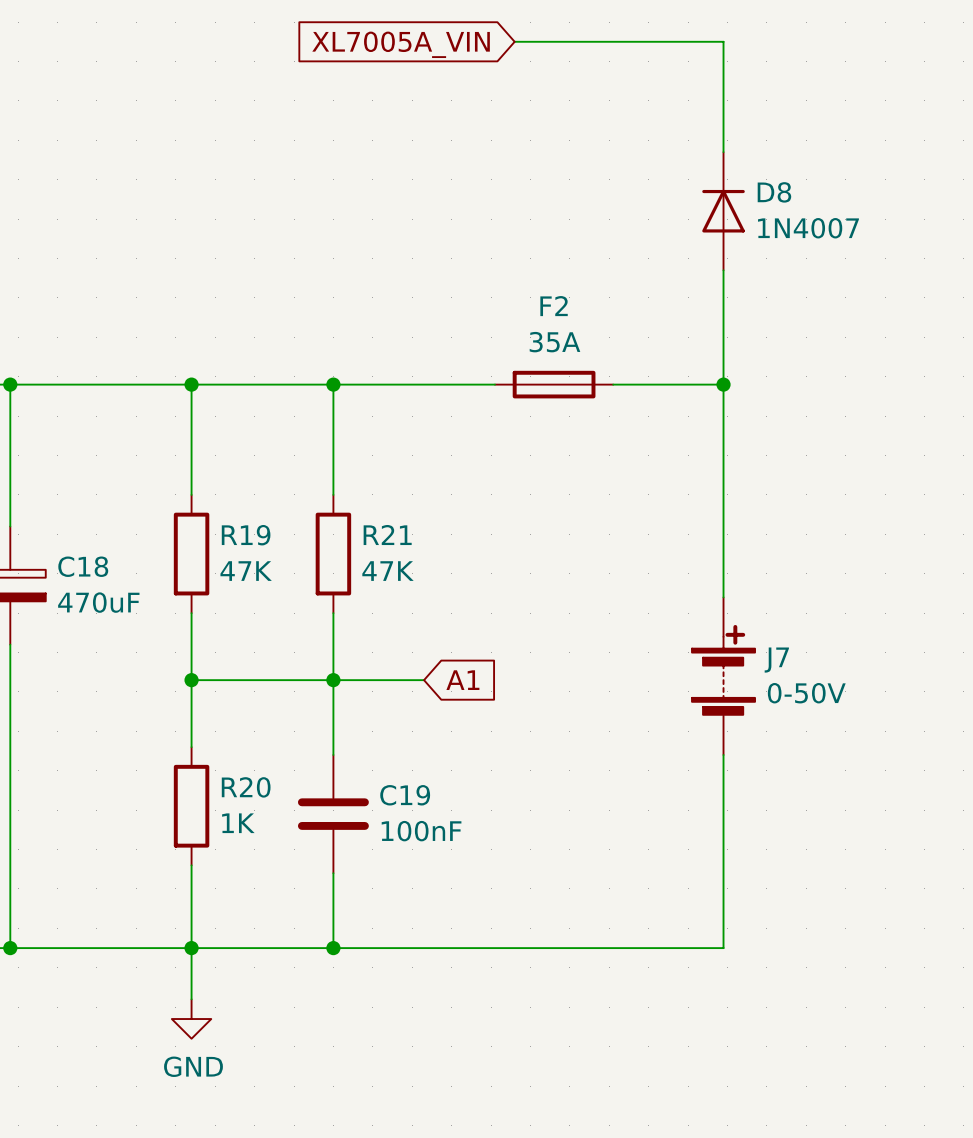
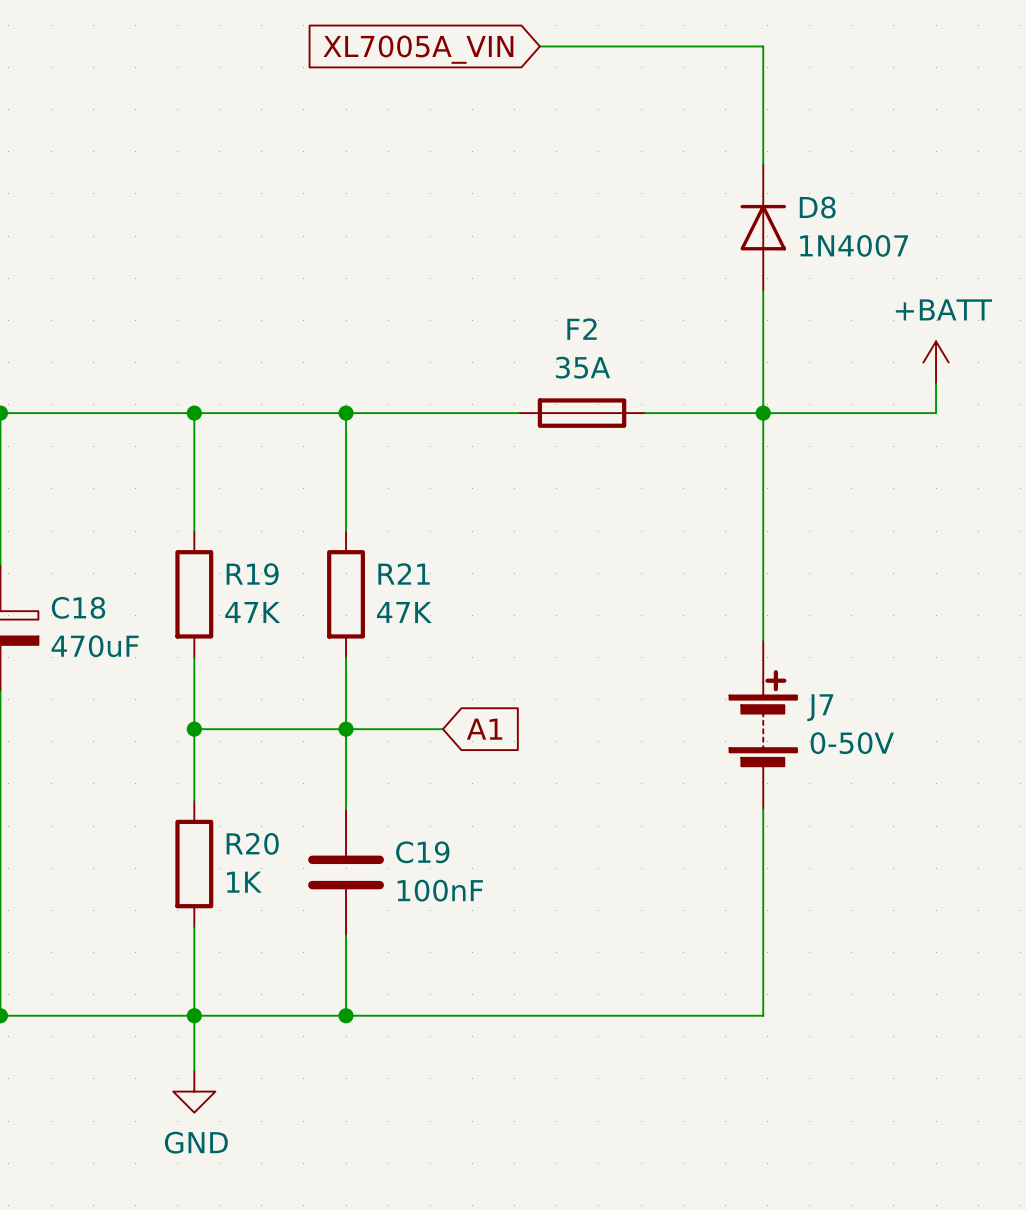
power symbol: none -> +BATT (936, 362)
wire: none -> (936, 383) (936, 413) (763, 413)

